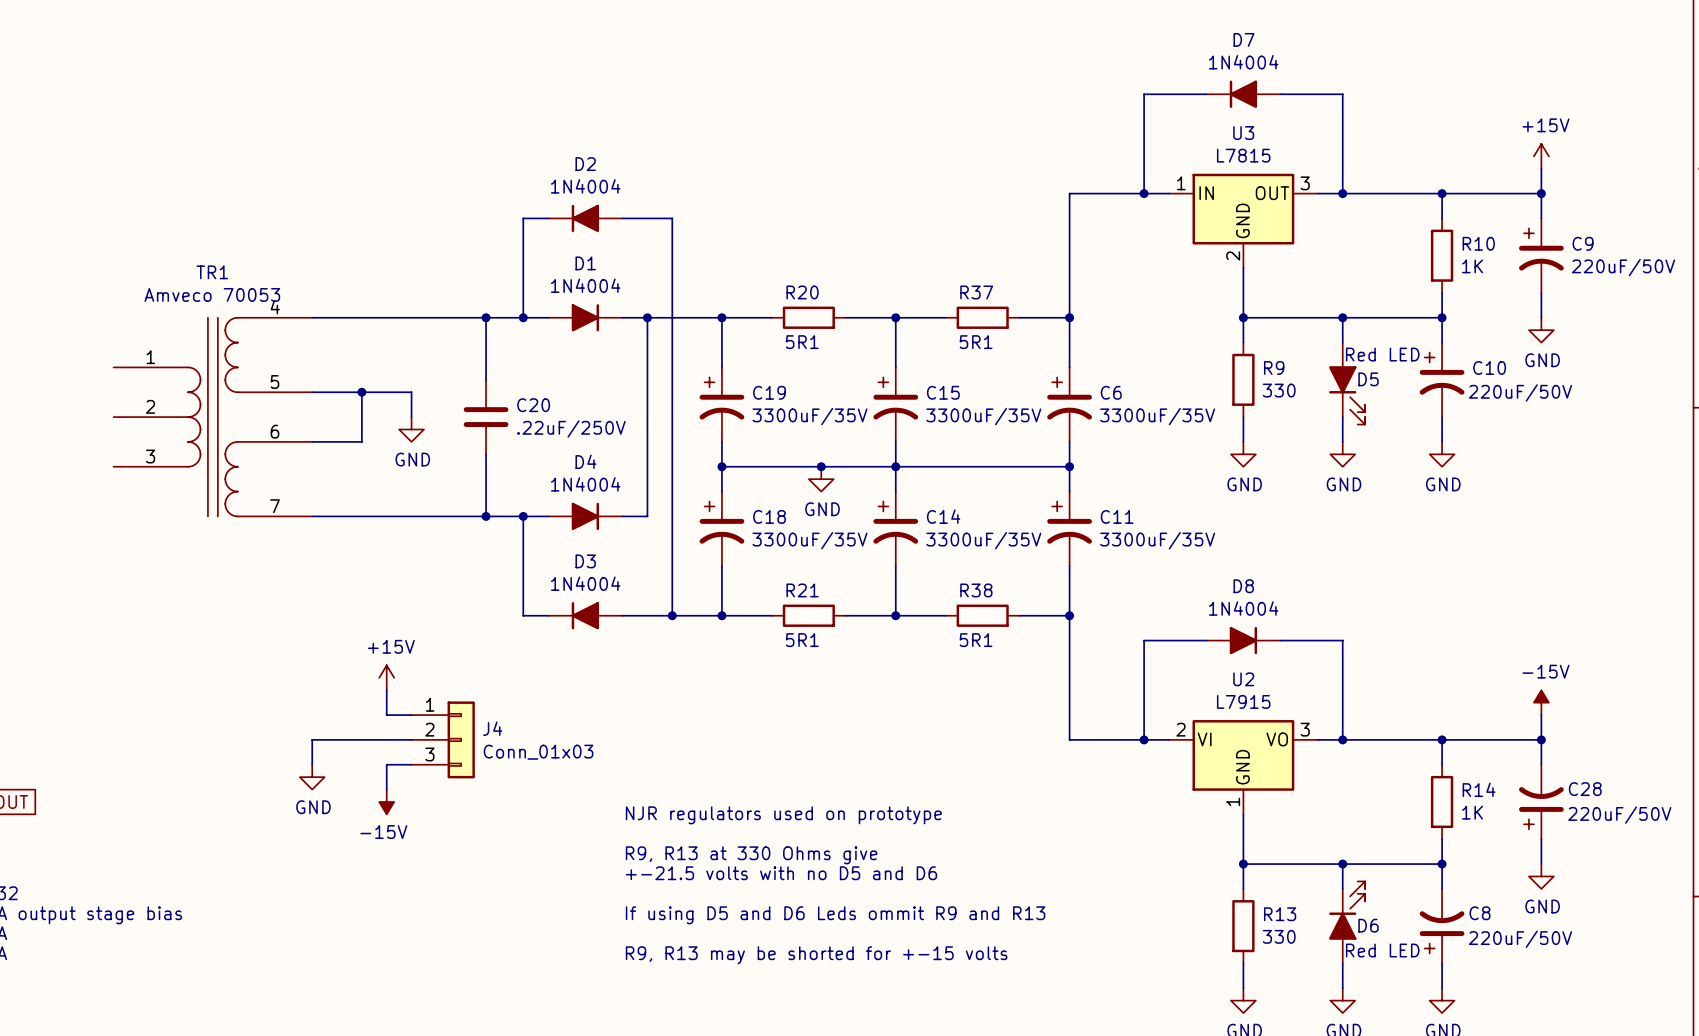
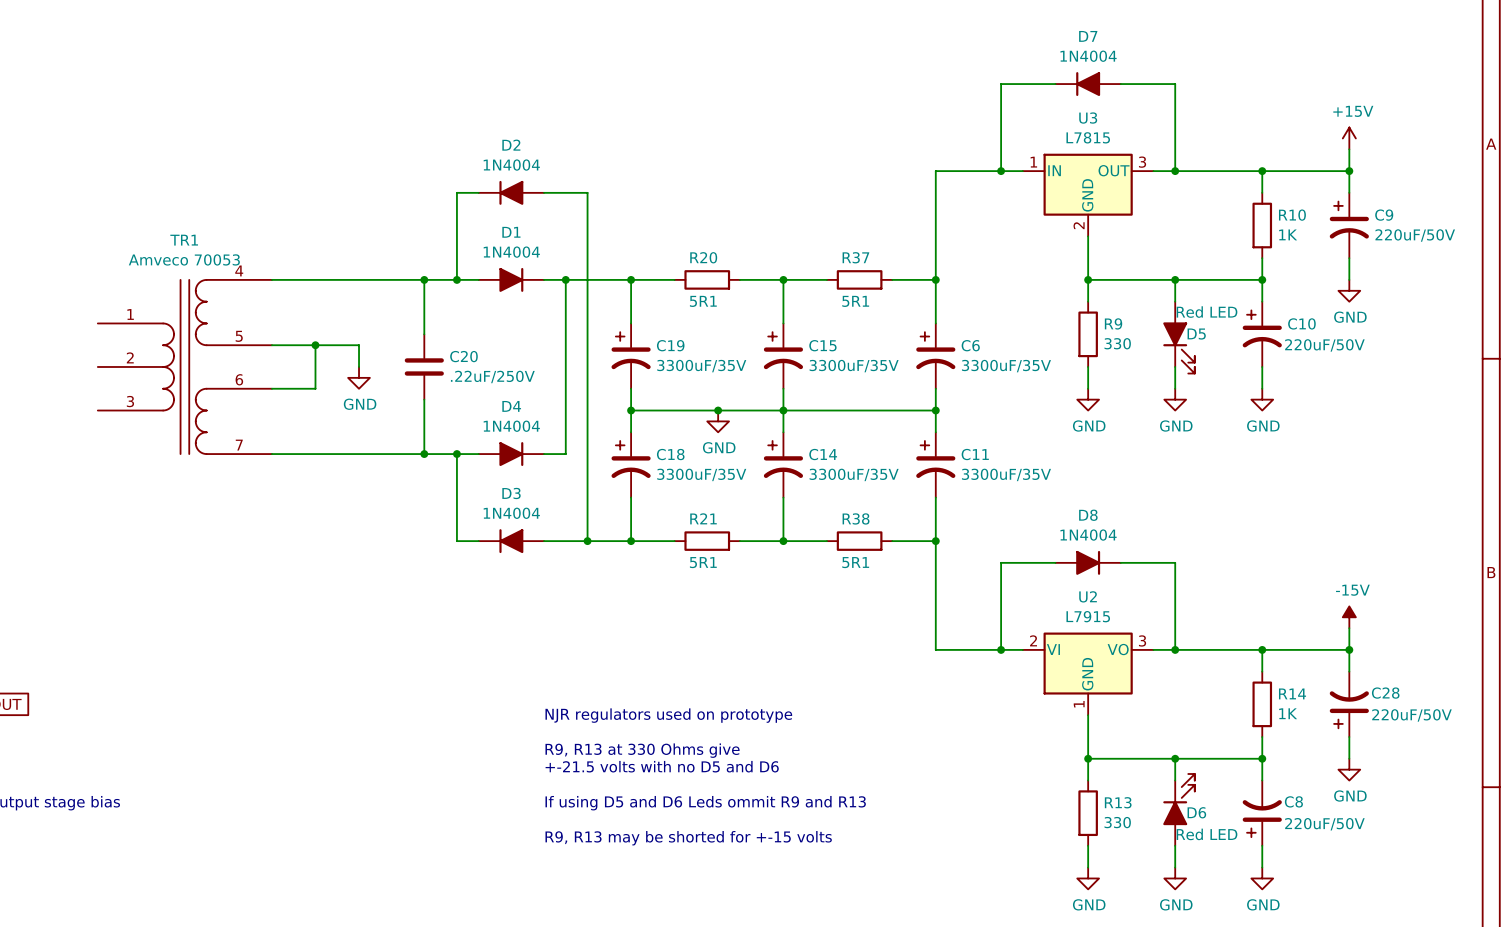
power symbol: +15V (386, 677) -> none
wire: (386, 690) (386, 715) (411, 715) -> none
wire: (411, 739) (312, 739) (312, 764) -> none
J4: Conn_01x03 (443, 739) -> none
wire: (411, 764) (386, 764) (386, 789) -> none
power symbol: GND (312, 777) -> none
power symbol: -15V (386, 801) -> none

